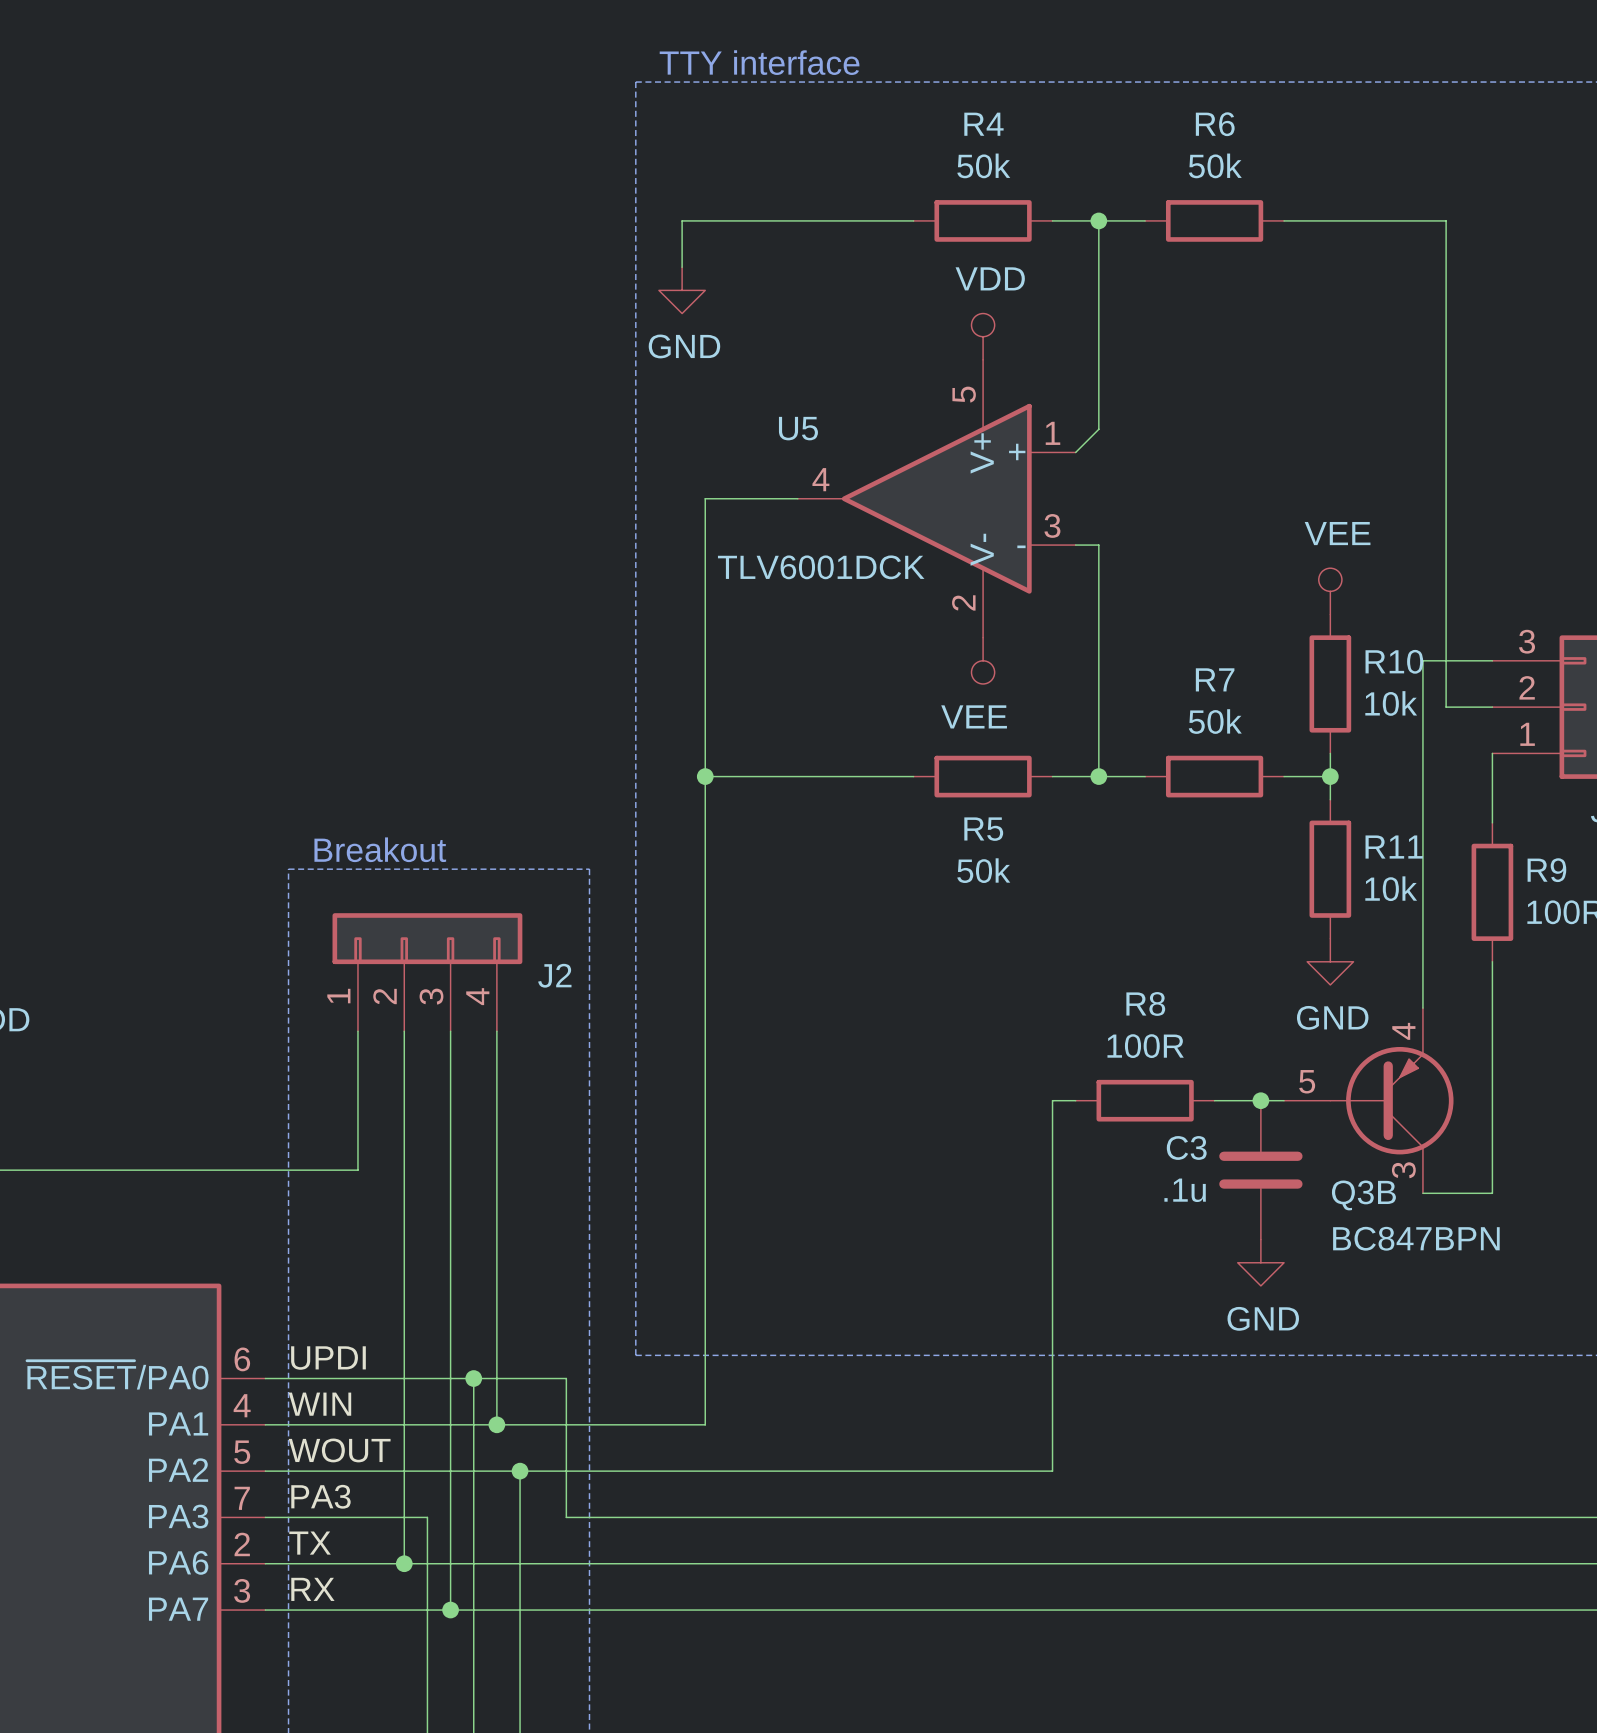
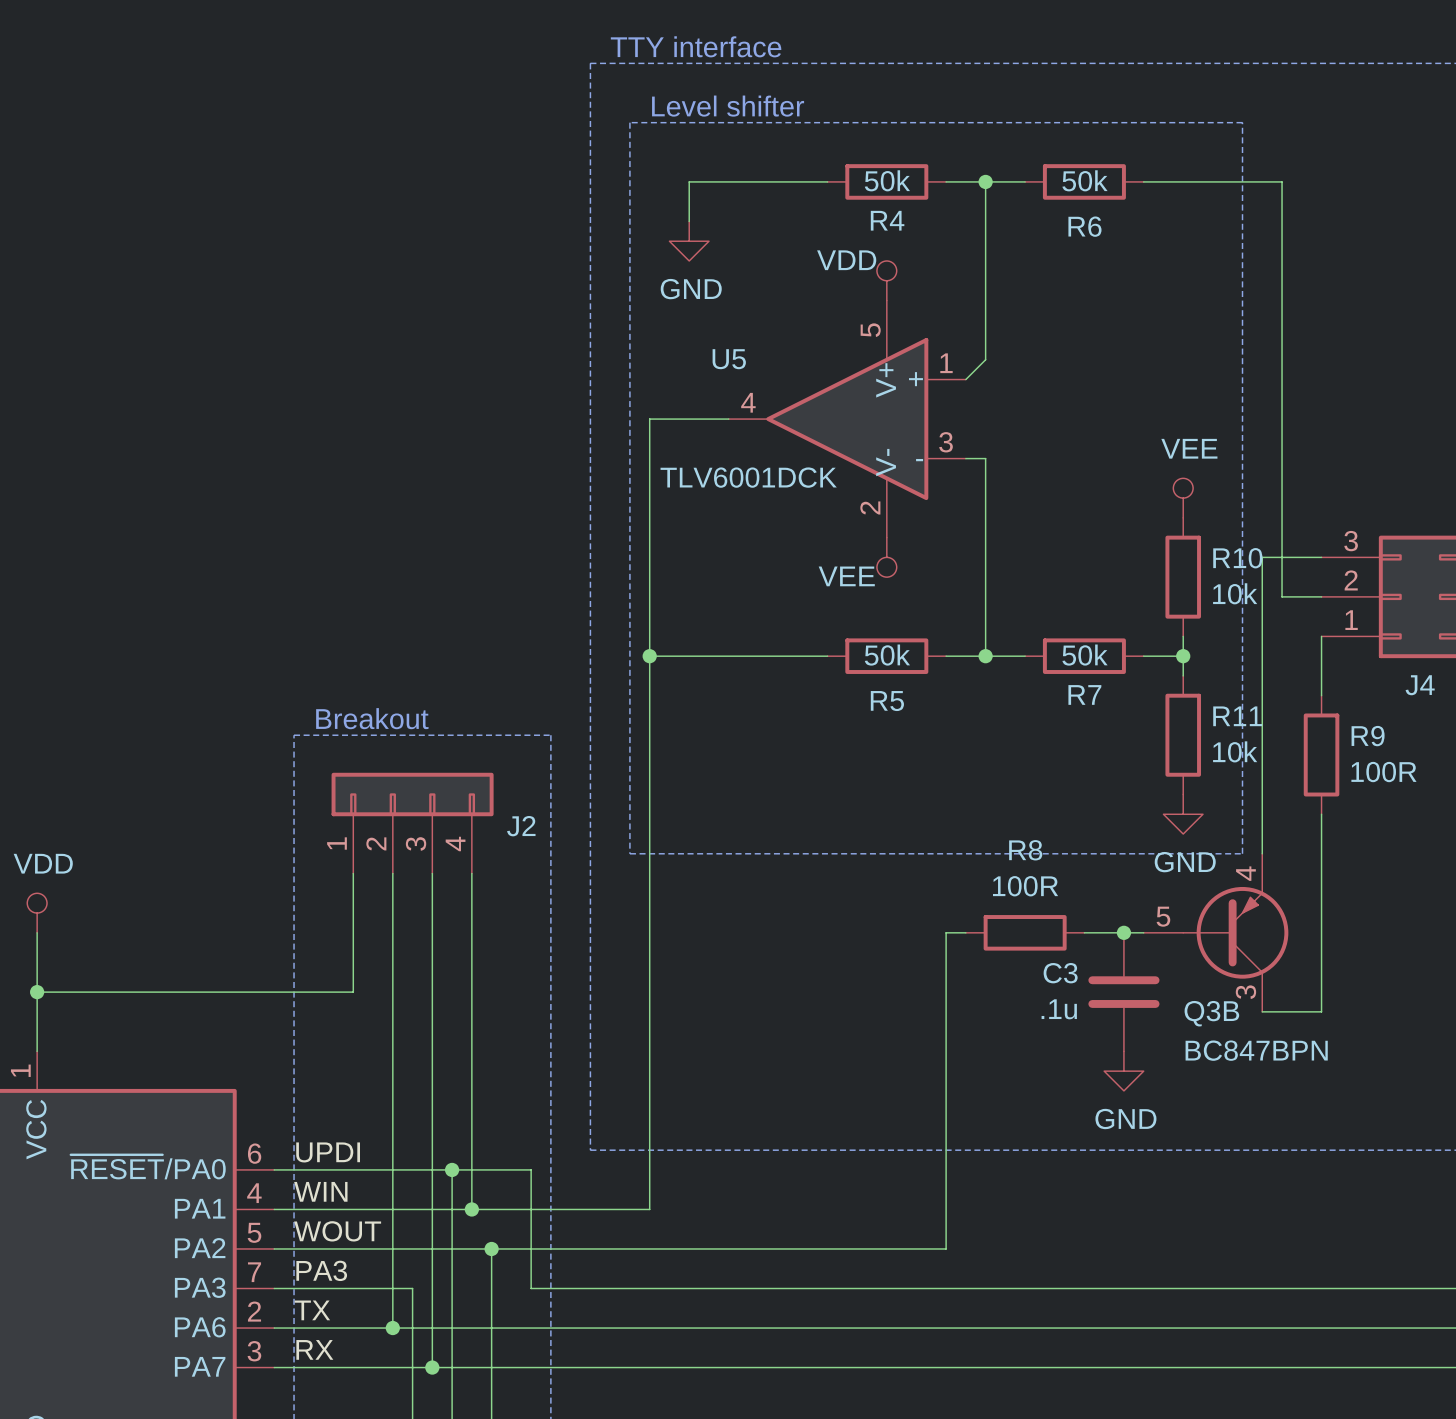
R4 name position: R4 (983, 124) -> R4 (887, 220)
R6 name position: R6 (1215, 124) -> R6 (1084, 226)
text: none -> Level shifter (728, 106)
line: none -> (629, 122) (629, 853) (1242, 853) (1242, 122) (629, 122)
R4 value position: 50k (983, 165) -> 50k (887, 180)
R6 value position: 50k (1215, 165) -> 50k (1085, 180)
wire: (751, 220) (682, 220) (682, 267) -> (689, 181) (689, 221)
power symbol text position: VDD (990, 278) -> VDD (846, 260)
power symbol position: GND (682, 290) -> GND (689, 241)
R7 name position: R7 (1215, 679) -> R7 (1084, 694)
power symbol text position: VEE (974, 716) -> VEE (846, 576)
R7 value position: 50k (1215, 721) -> 50k (1085, 655)
R5 value position: 50k (983, 870) -> 50k (887, 655)

